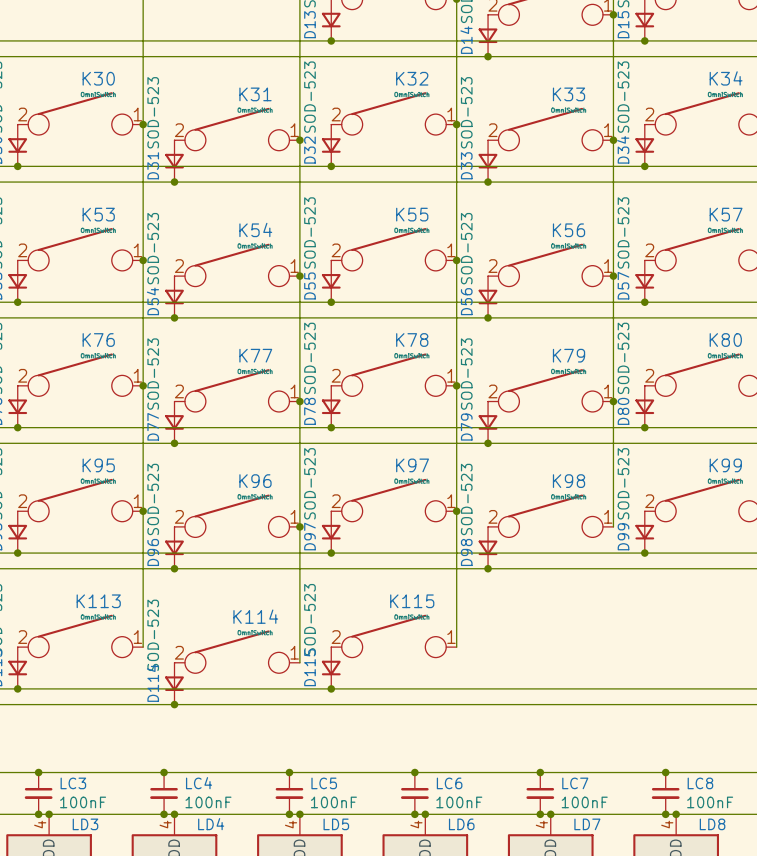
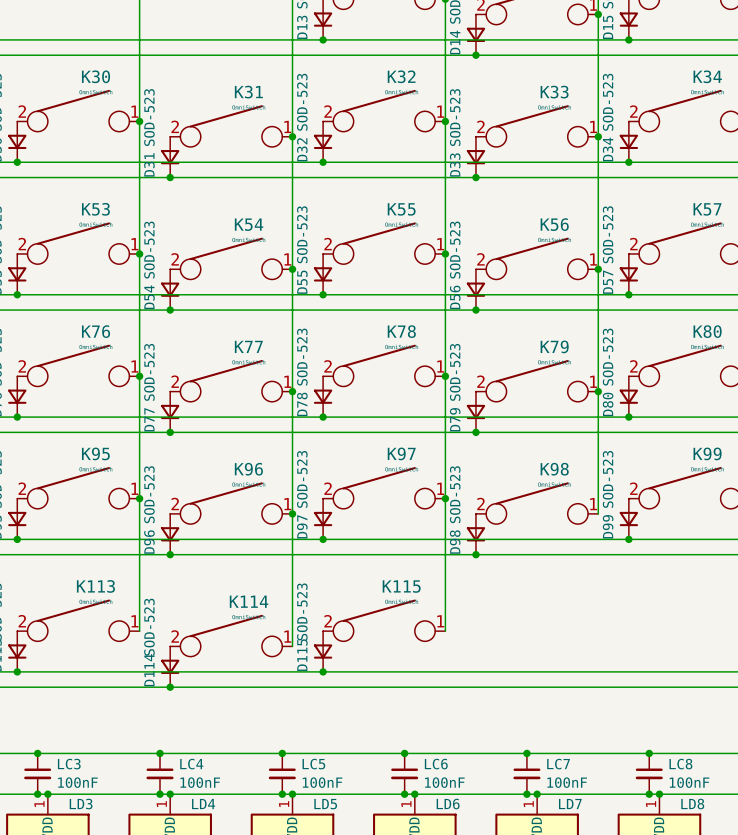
LD3 pin number: 4 (40, 824) -> 1 (39, 804)
LD4 pin number: 4 (165, 824) -> 1 (161, 804)
LD5 pin number: 4 (291, 824) -> 1 (284, 804)
LD6 pin number: 4 (416, 824) -> 1 (406, 804)
LD7 pin number: 4 (541, 824) -> 1 (528, 804)
LD8 pin number: 4 (667, 824) -> 1 (651, 804)

